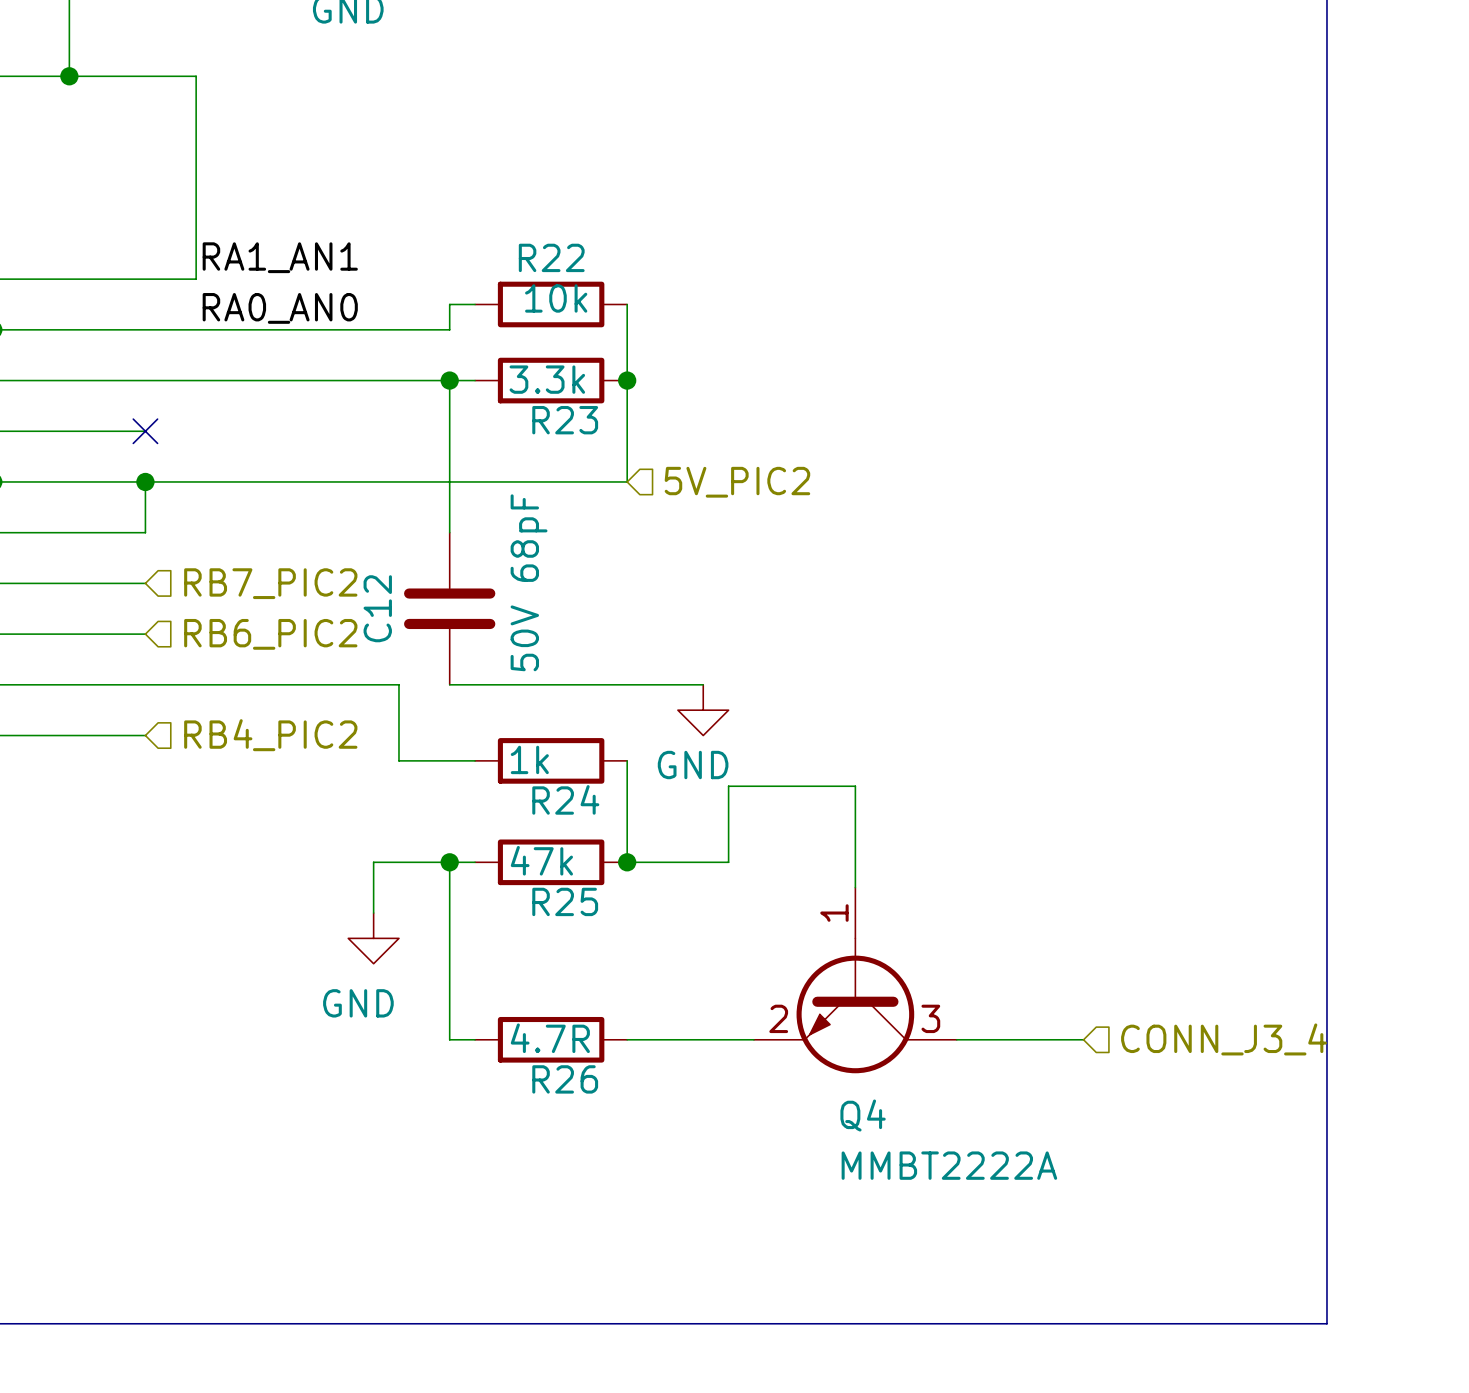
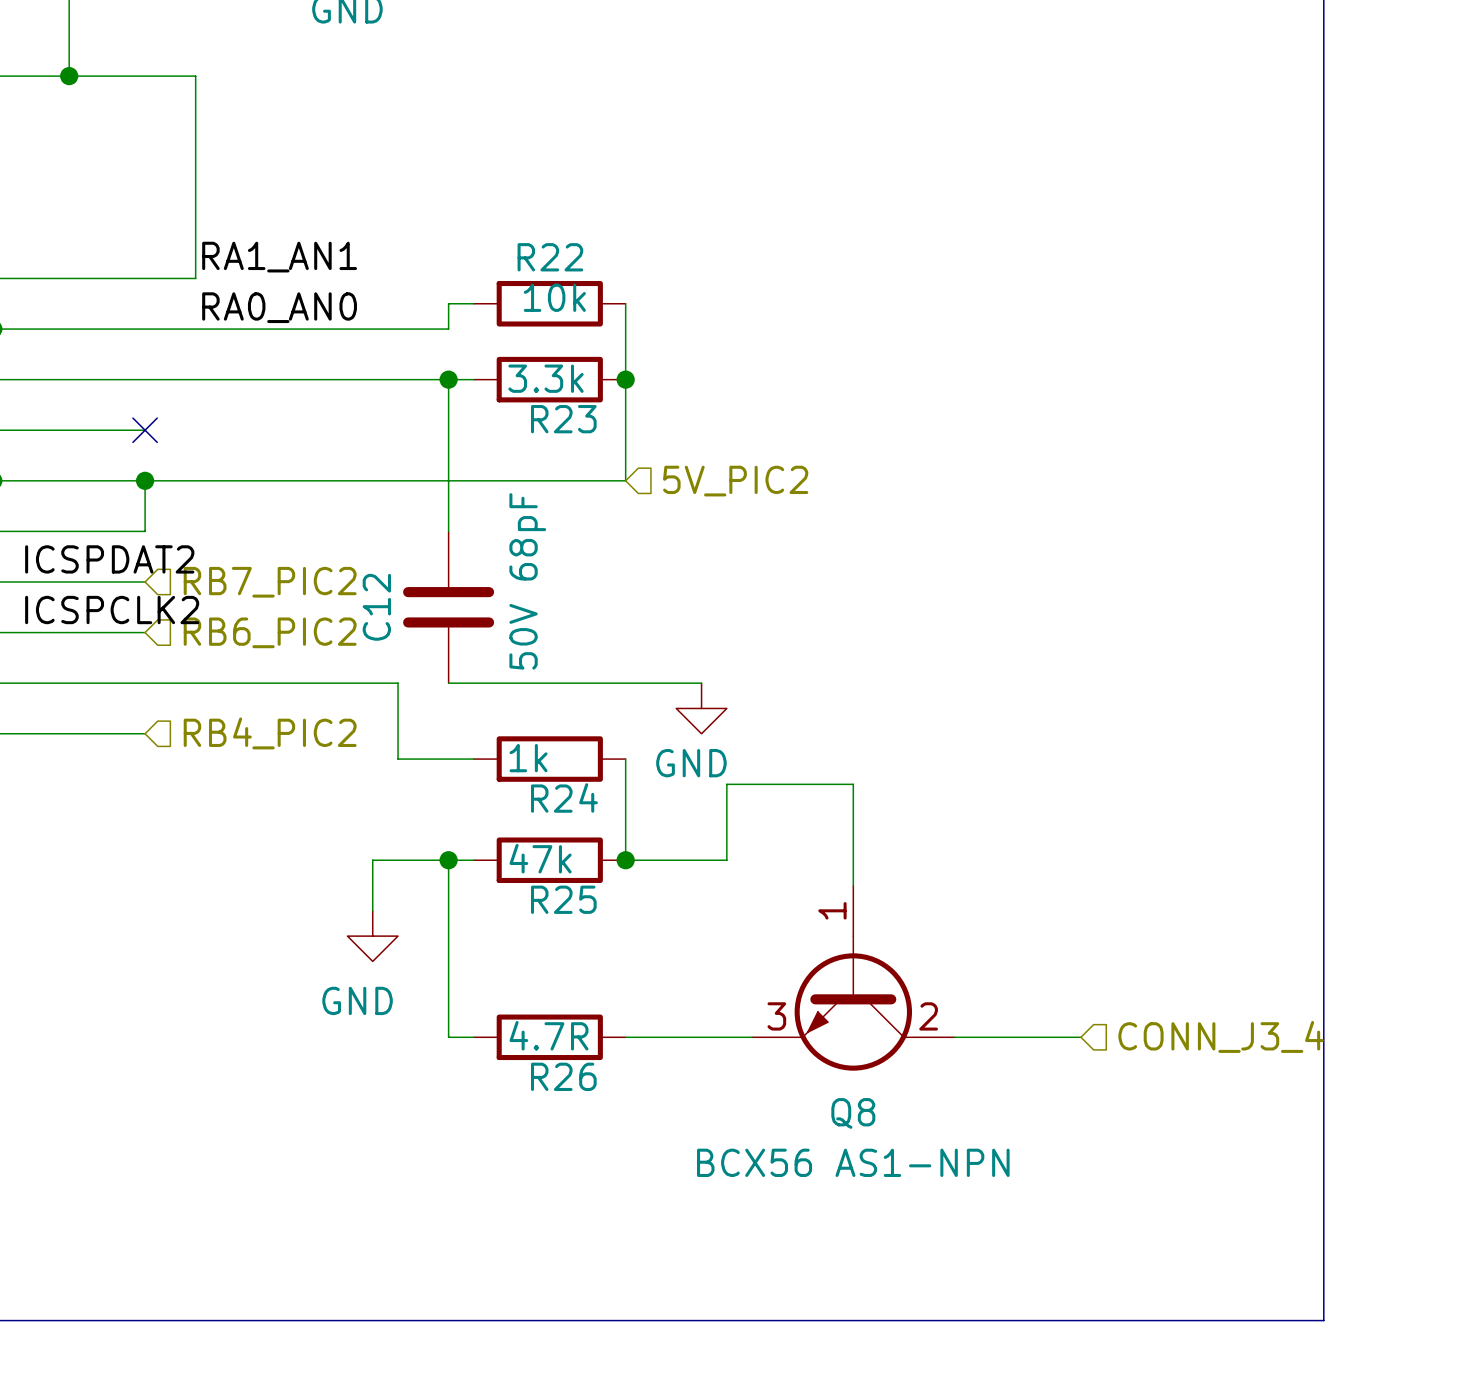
label: none -> ICSPDAT2 (109, 559)
label: none -> ICSPCLK2 (112, 610)
Q4 pin number: 2 (778, 1018) -> 3 (776, 1016)
Q4 pin number: 3 (930, 1018) -> 2 (928, 1016)
Q4 name: Q4 (863, 1115) -> Q8 (853, 1113)
Q4 value: MMBT2222A (949, 1165) -> BCX56 AS1-NPN (853, 1162)

